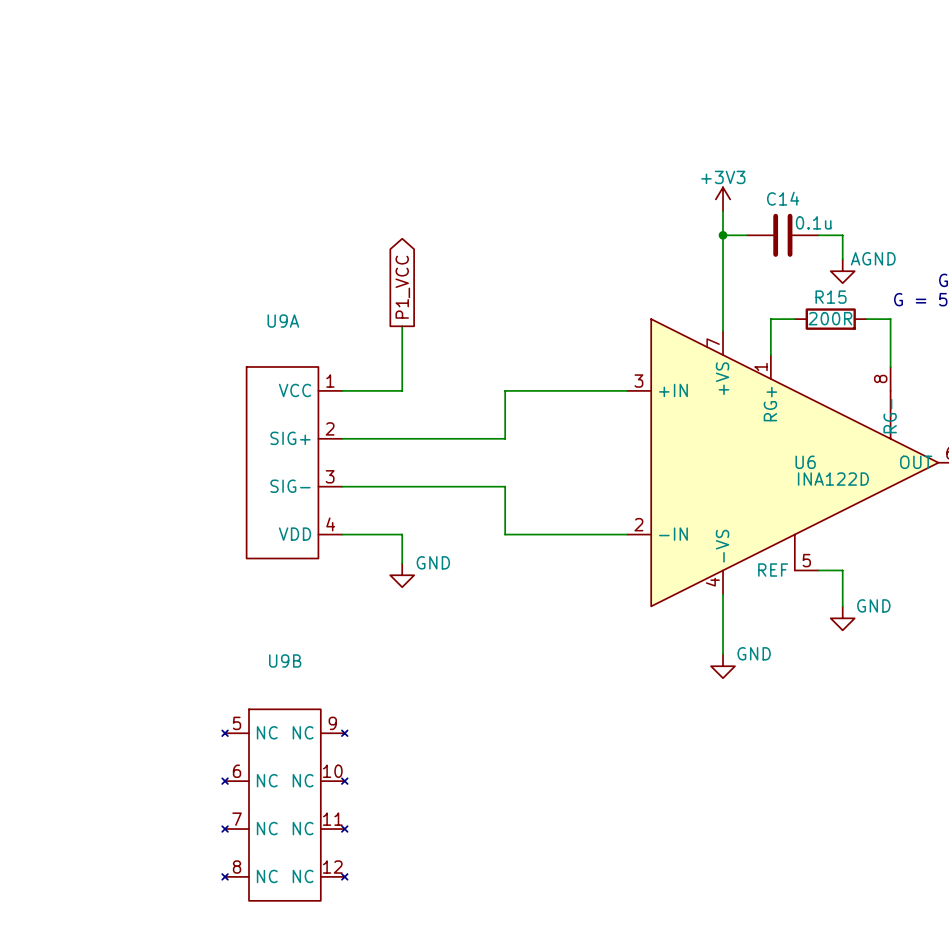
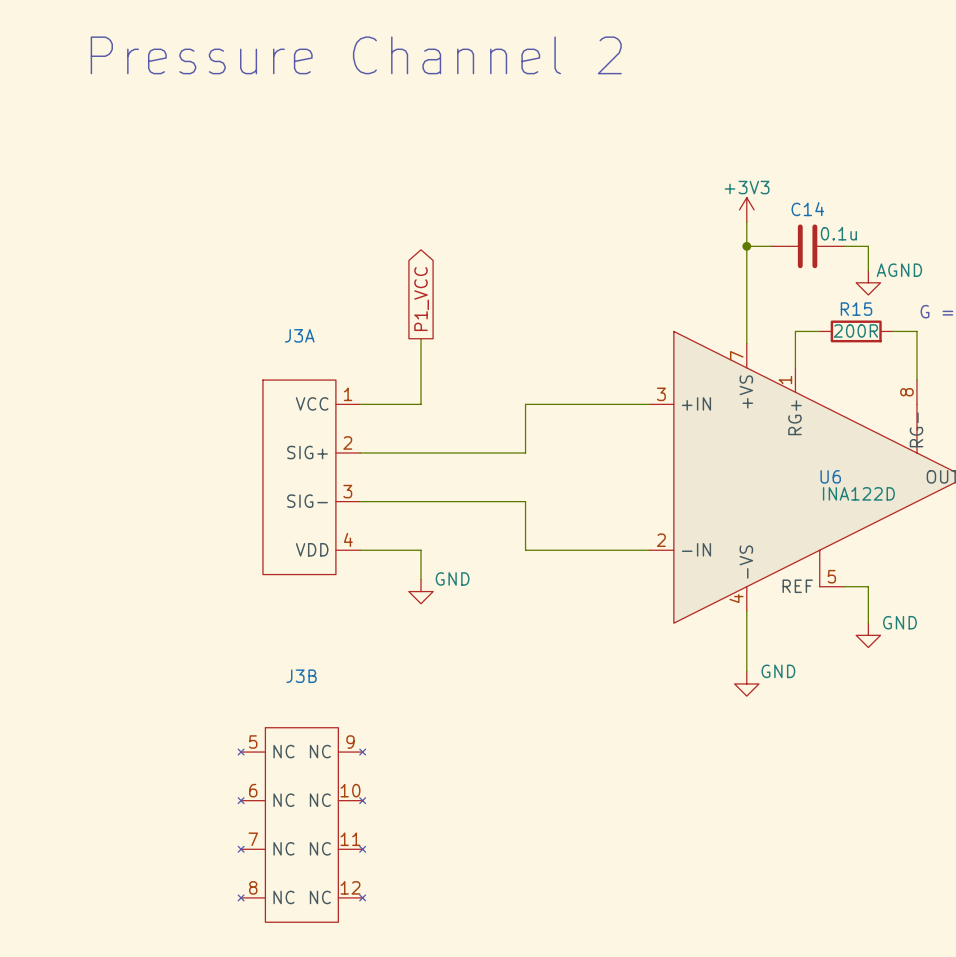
text: none -> Pressure Channel 2 (356, 55)
U9A name: U9A (283, 321) -> J3A (299, 335)
U9B name: U9B (285, 660) -> J3B (301, 676)

